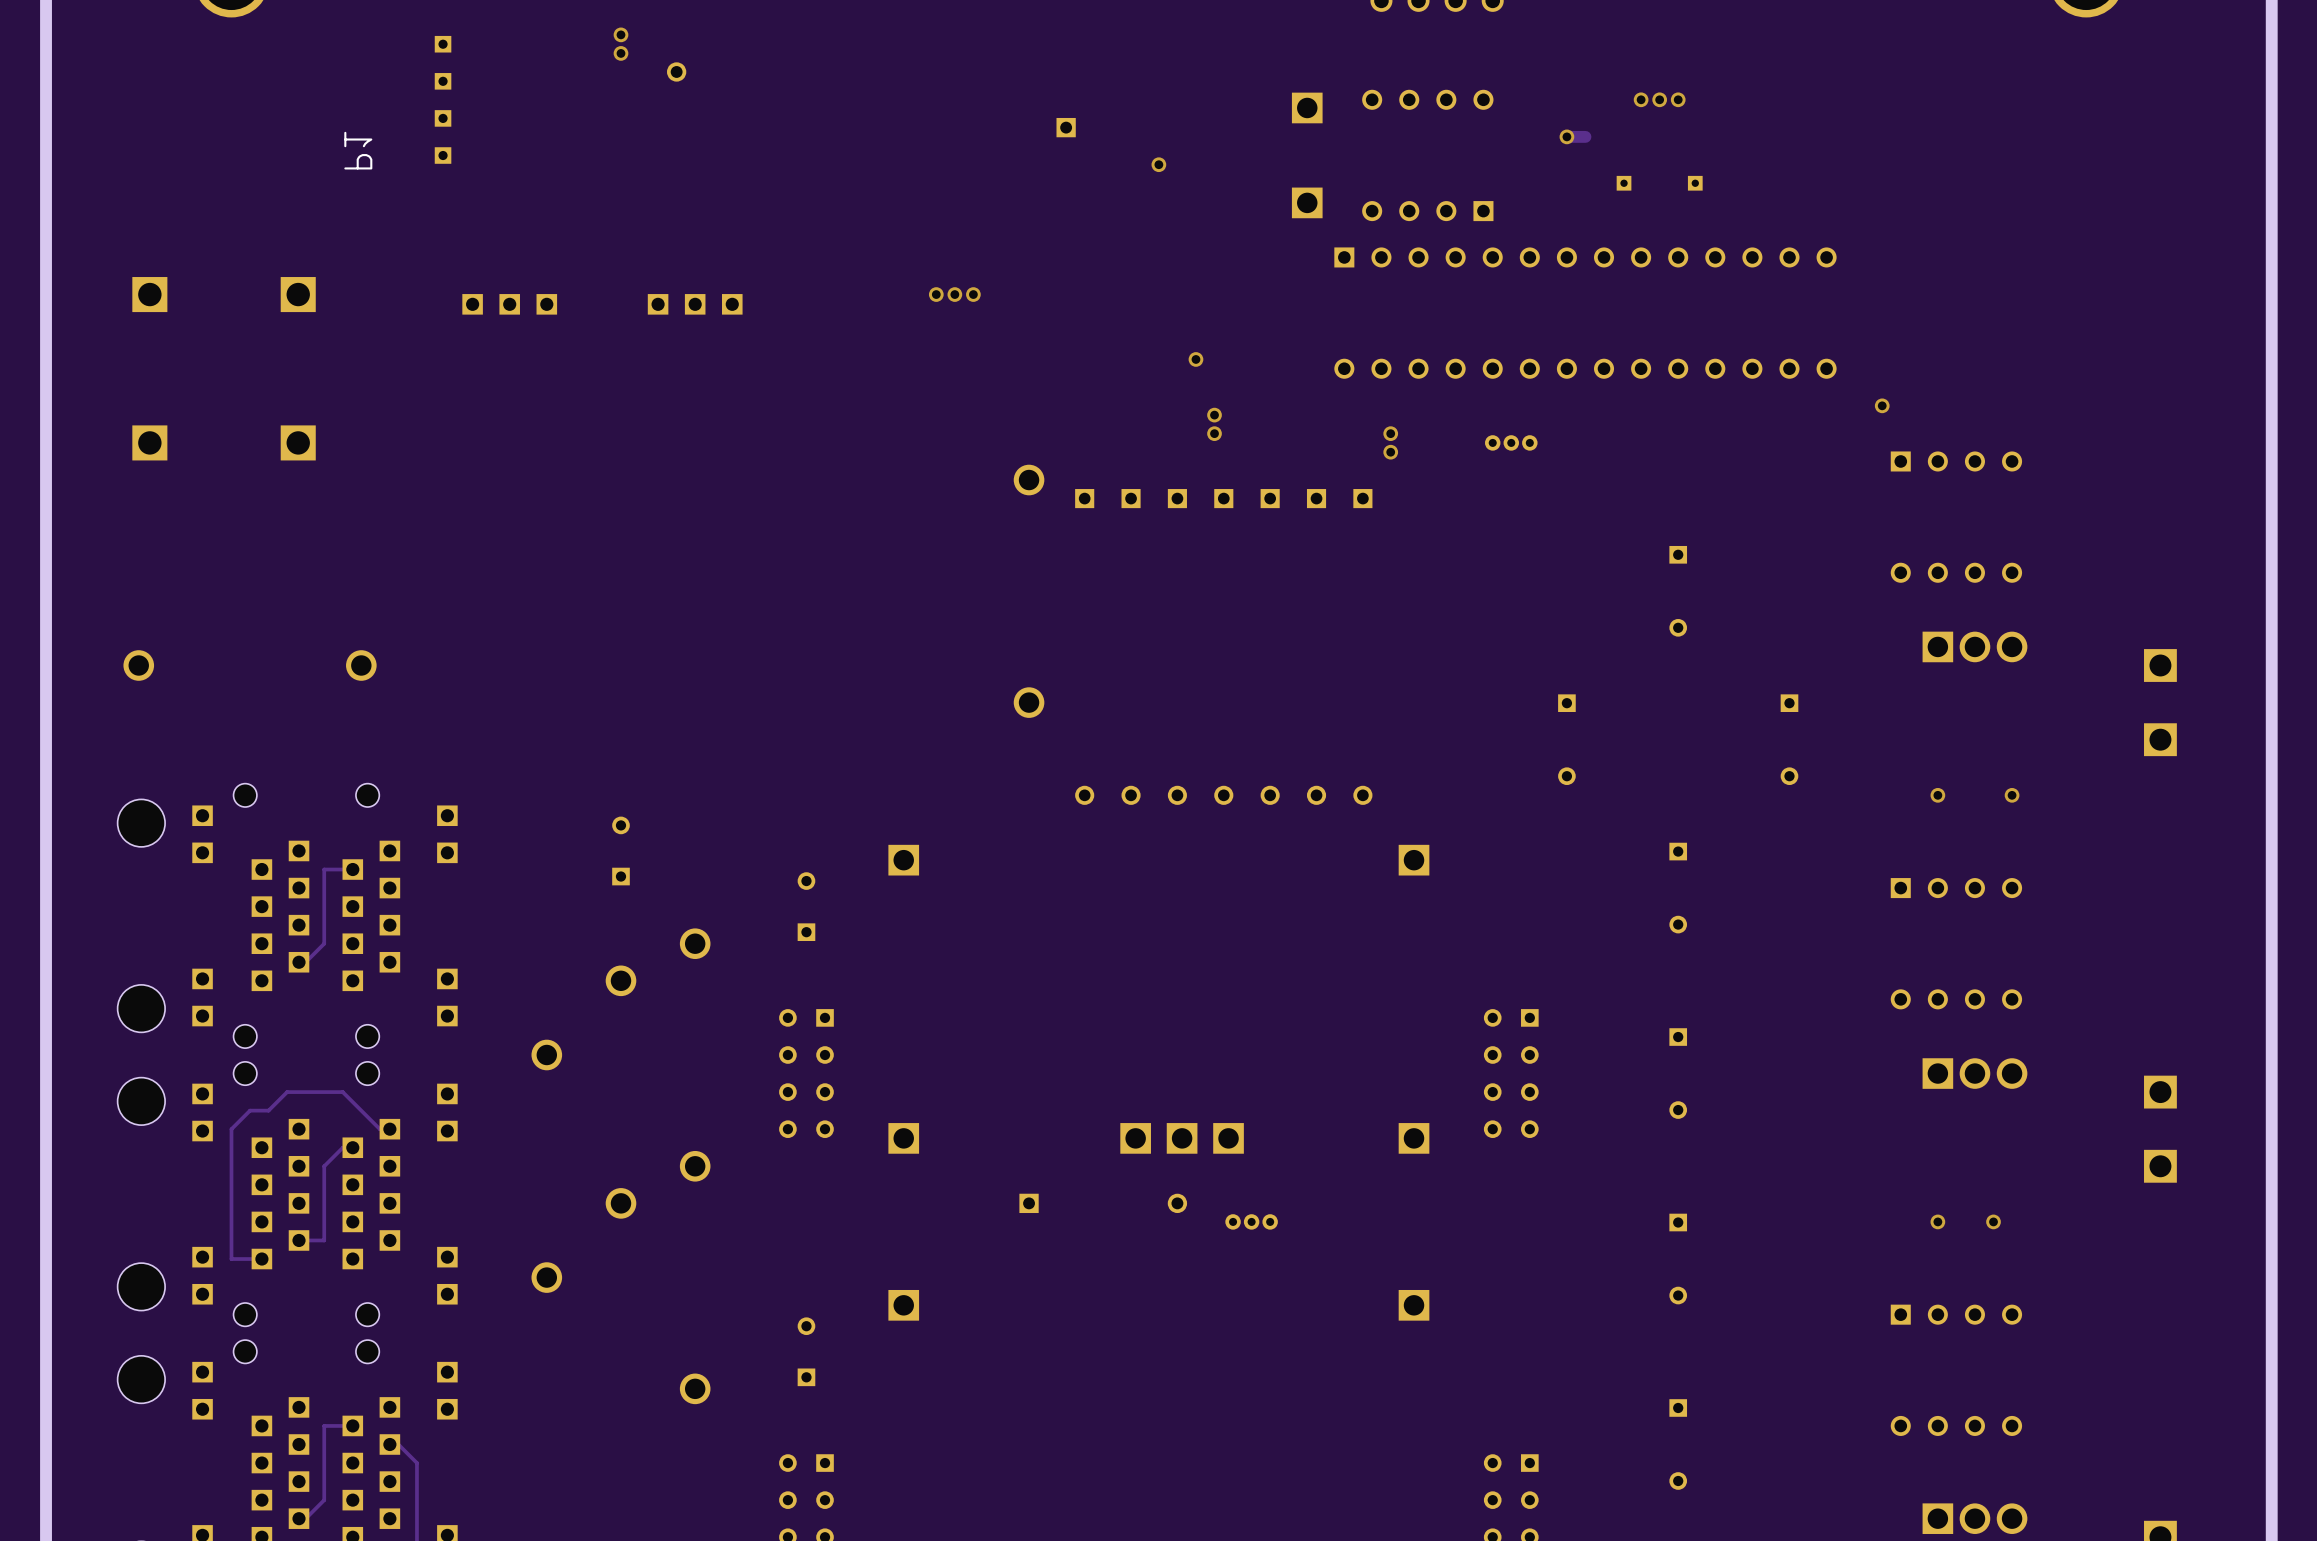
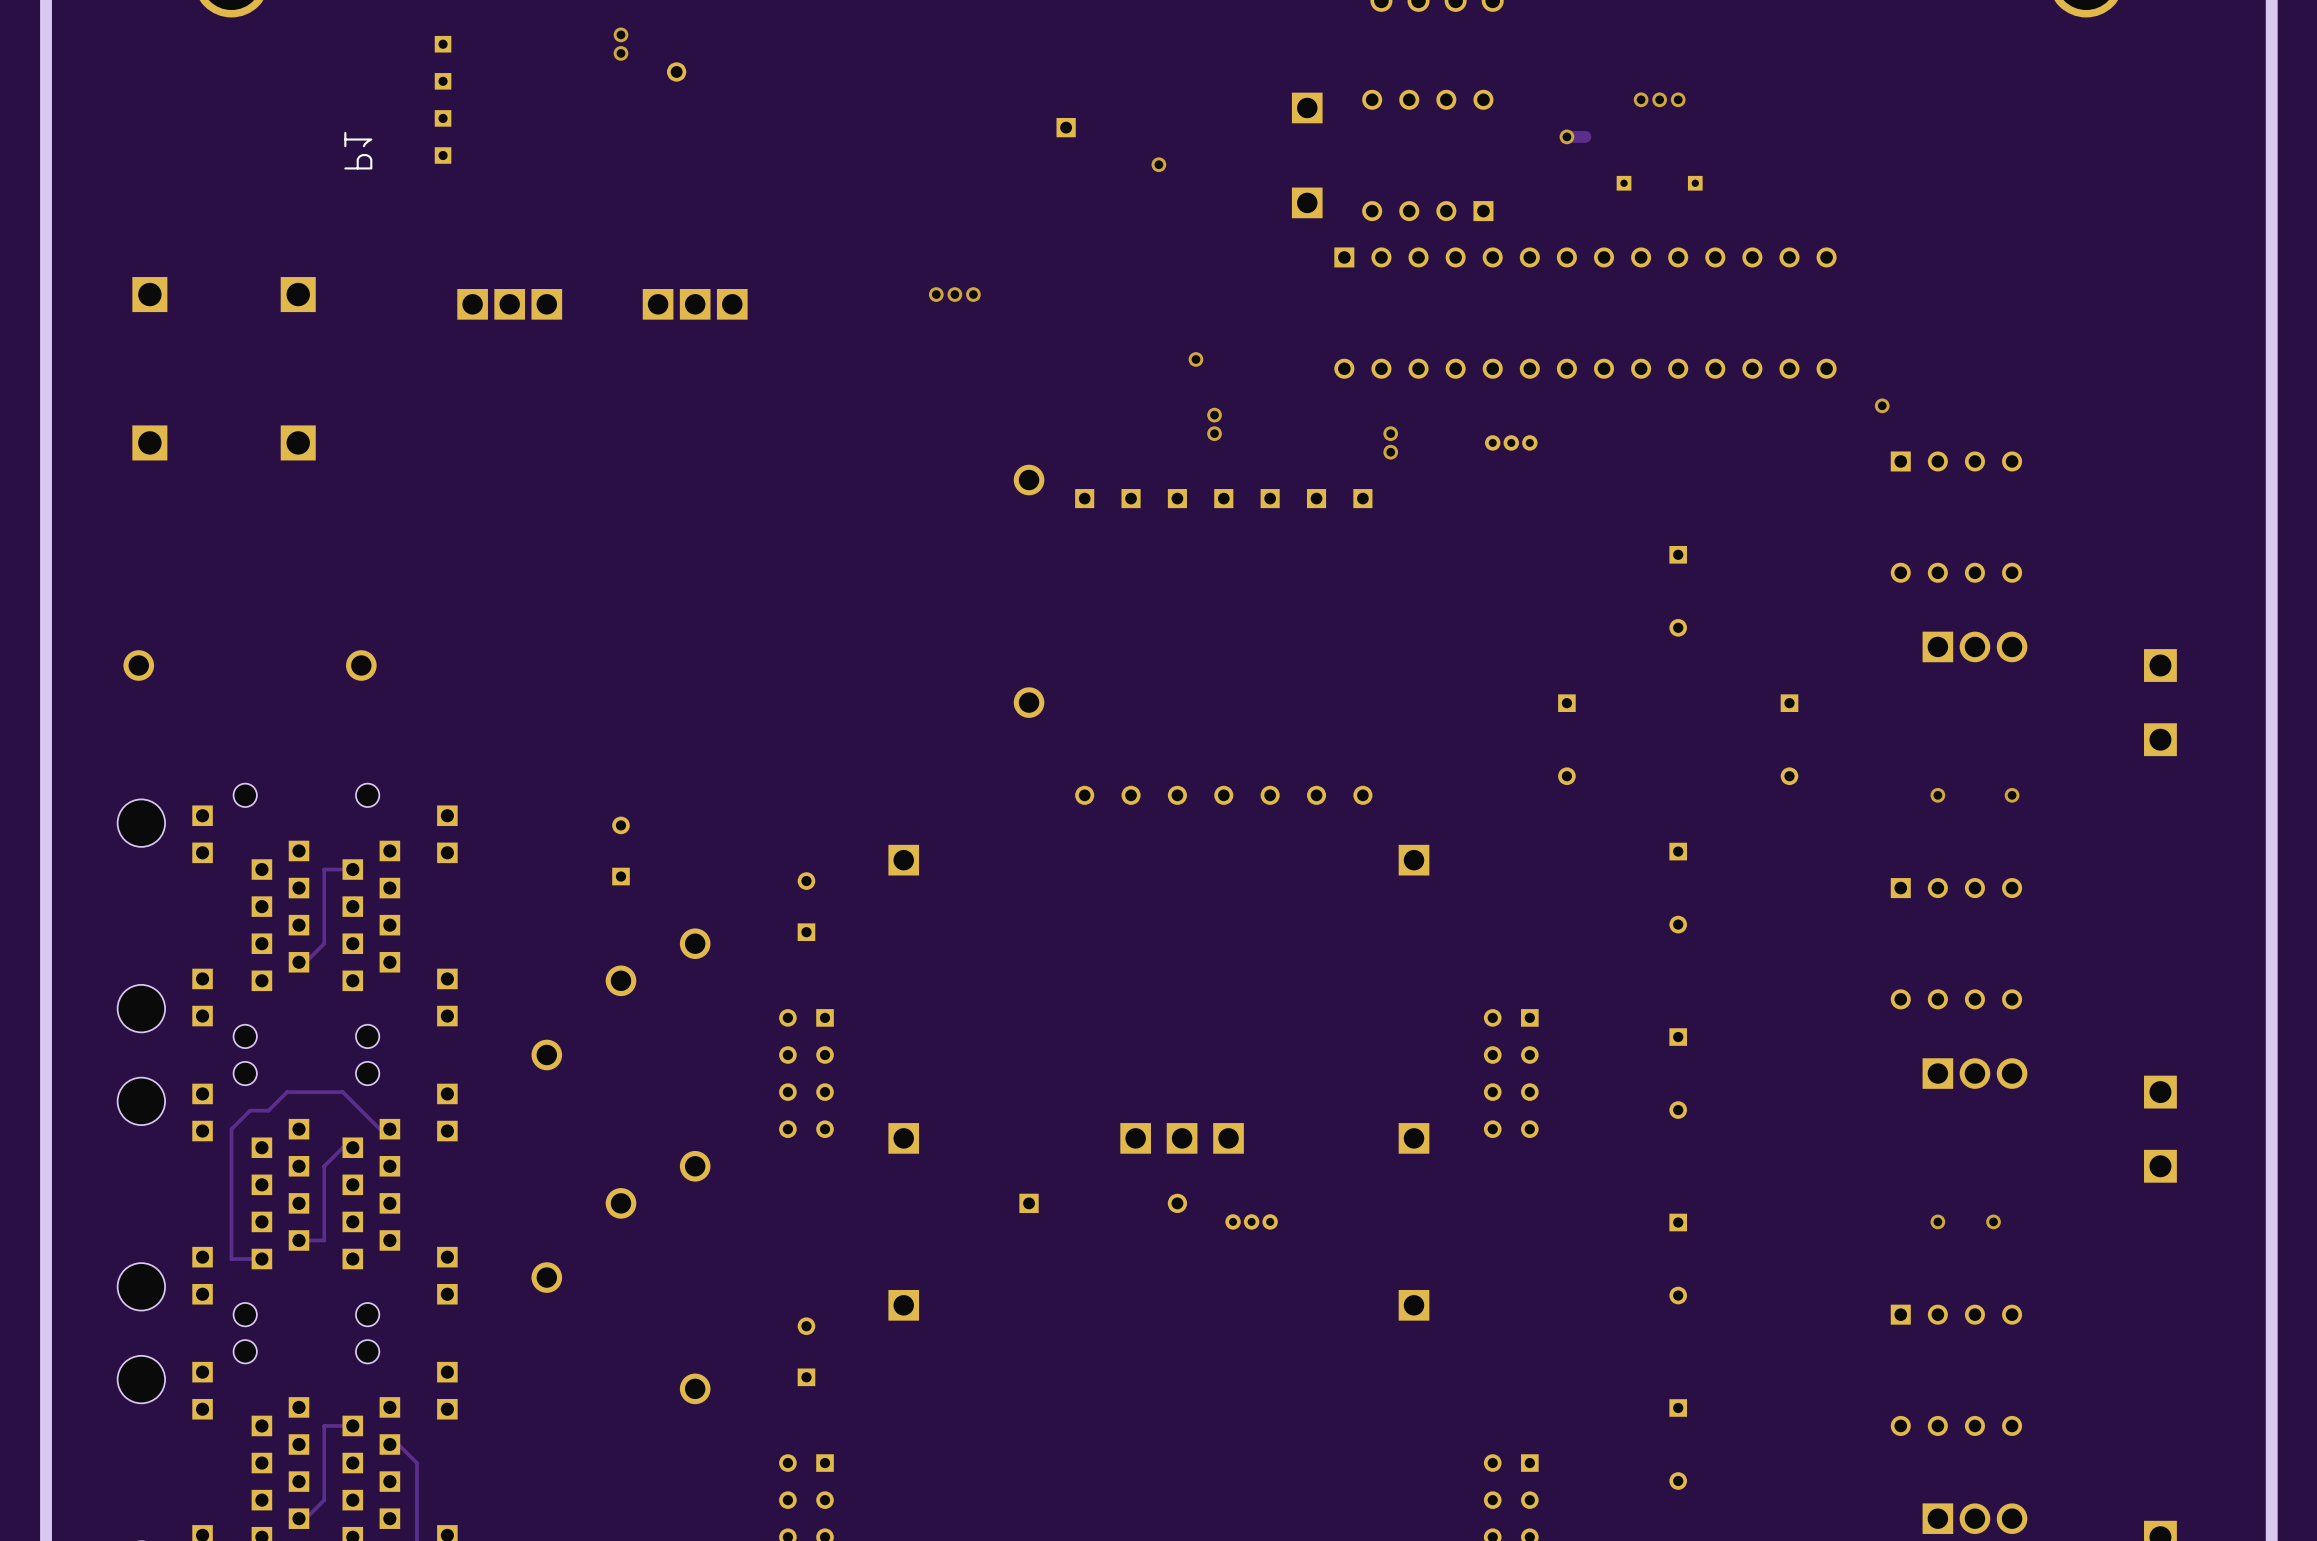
part footprint: [462, 294, 558, 315] -> [457, 288, 563, 320]
part footprint: [647, 294, 743, 315] -> [642, 288, 748, 320]

